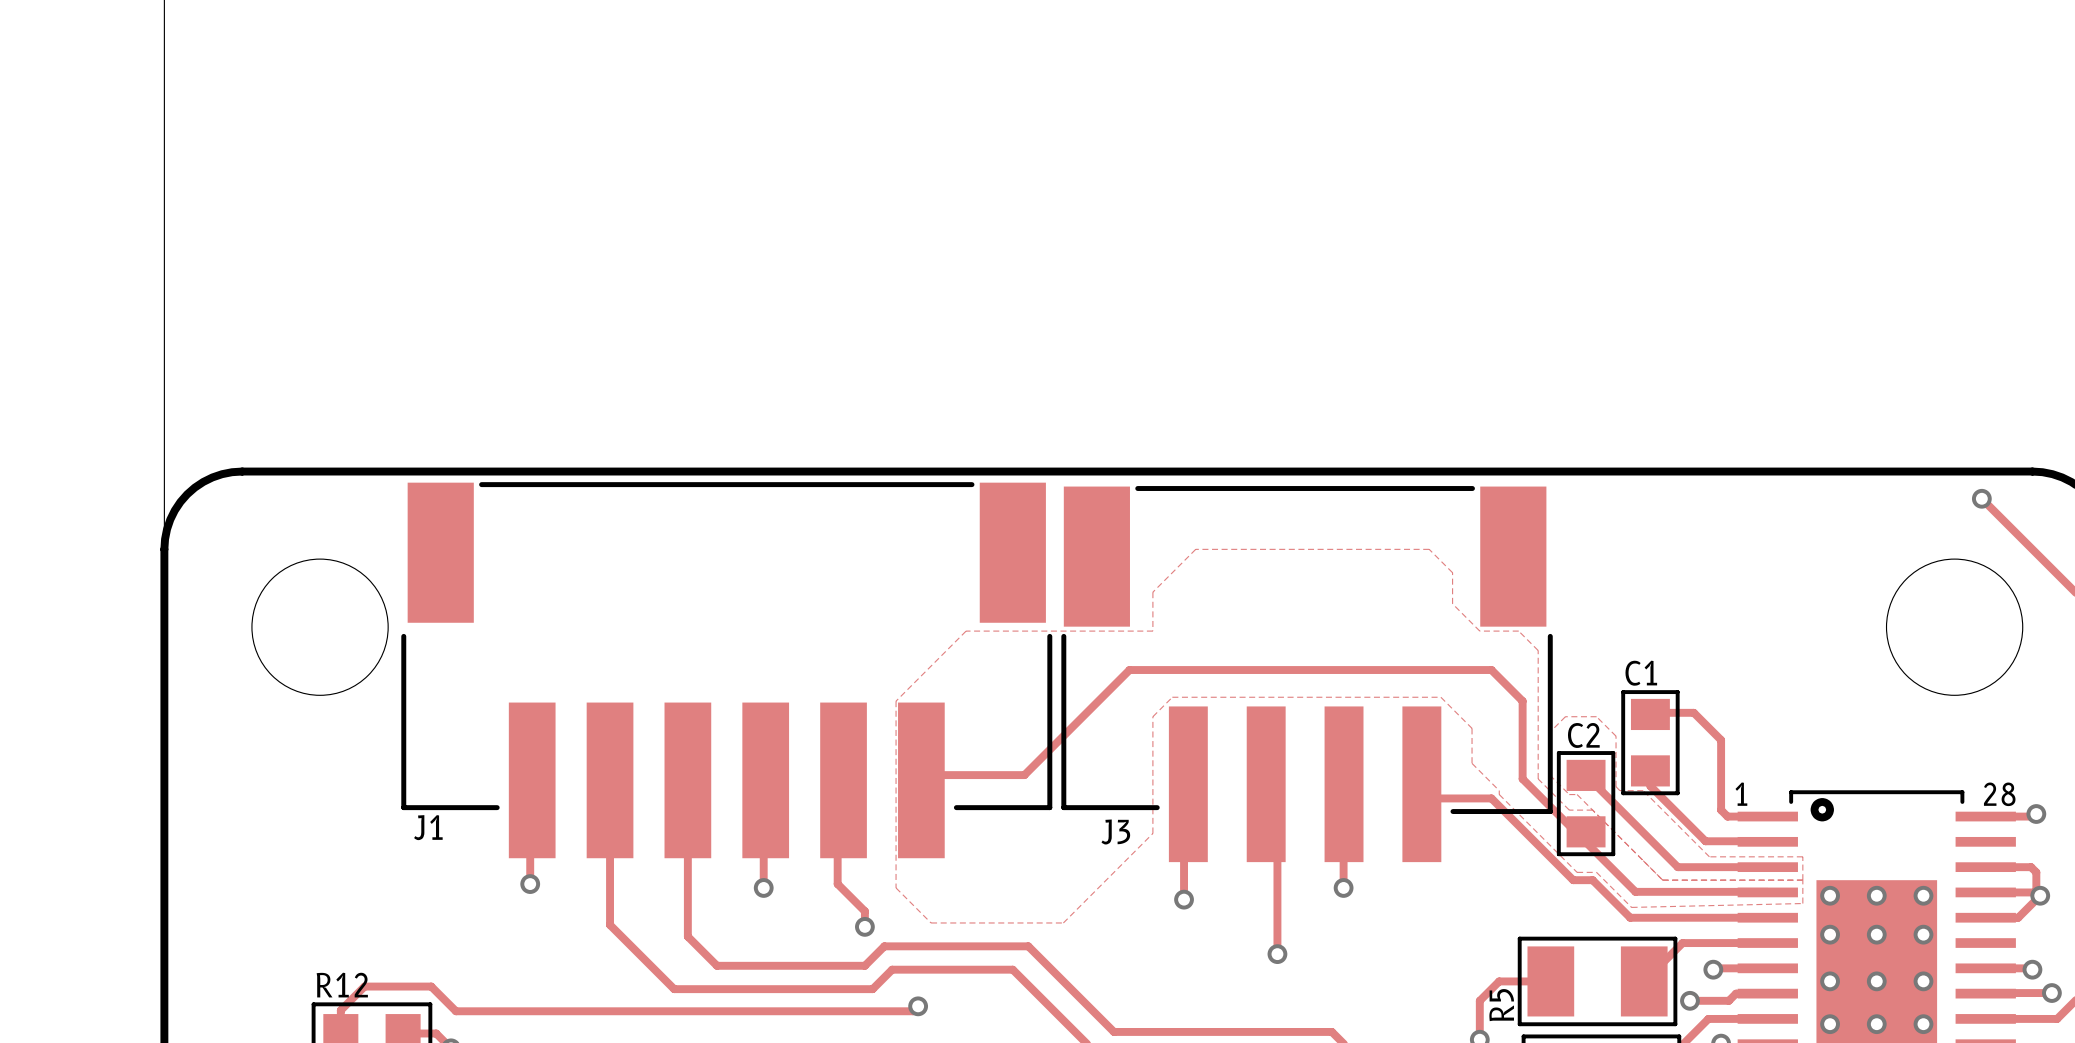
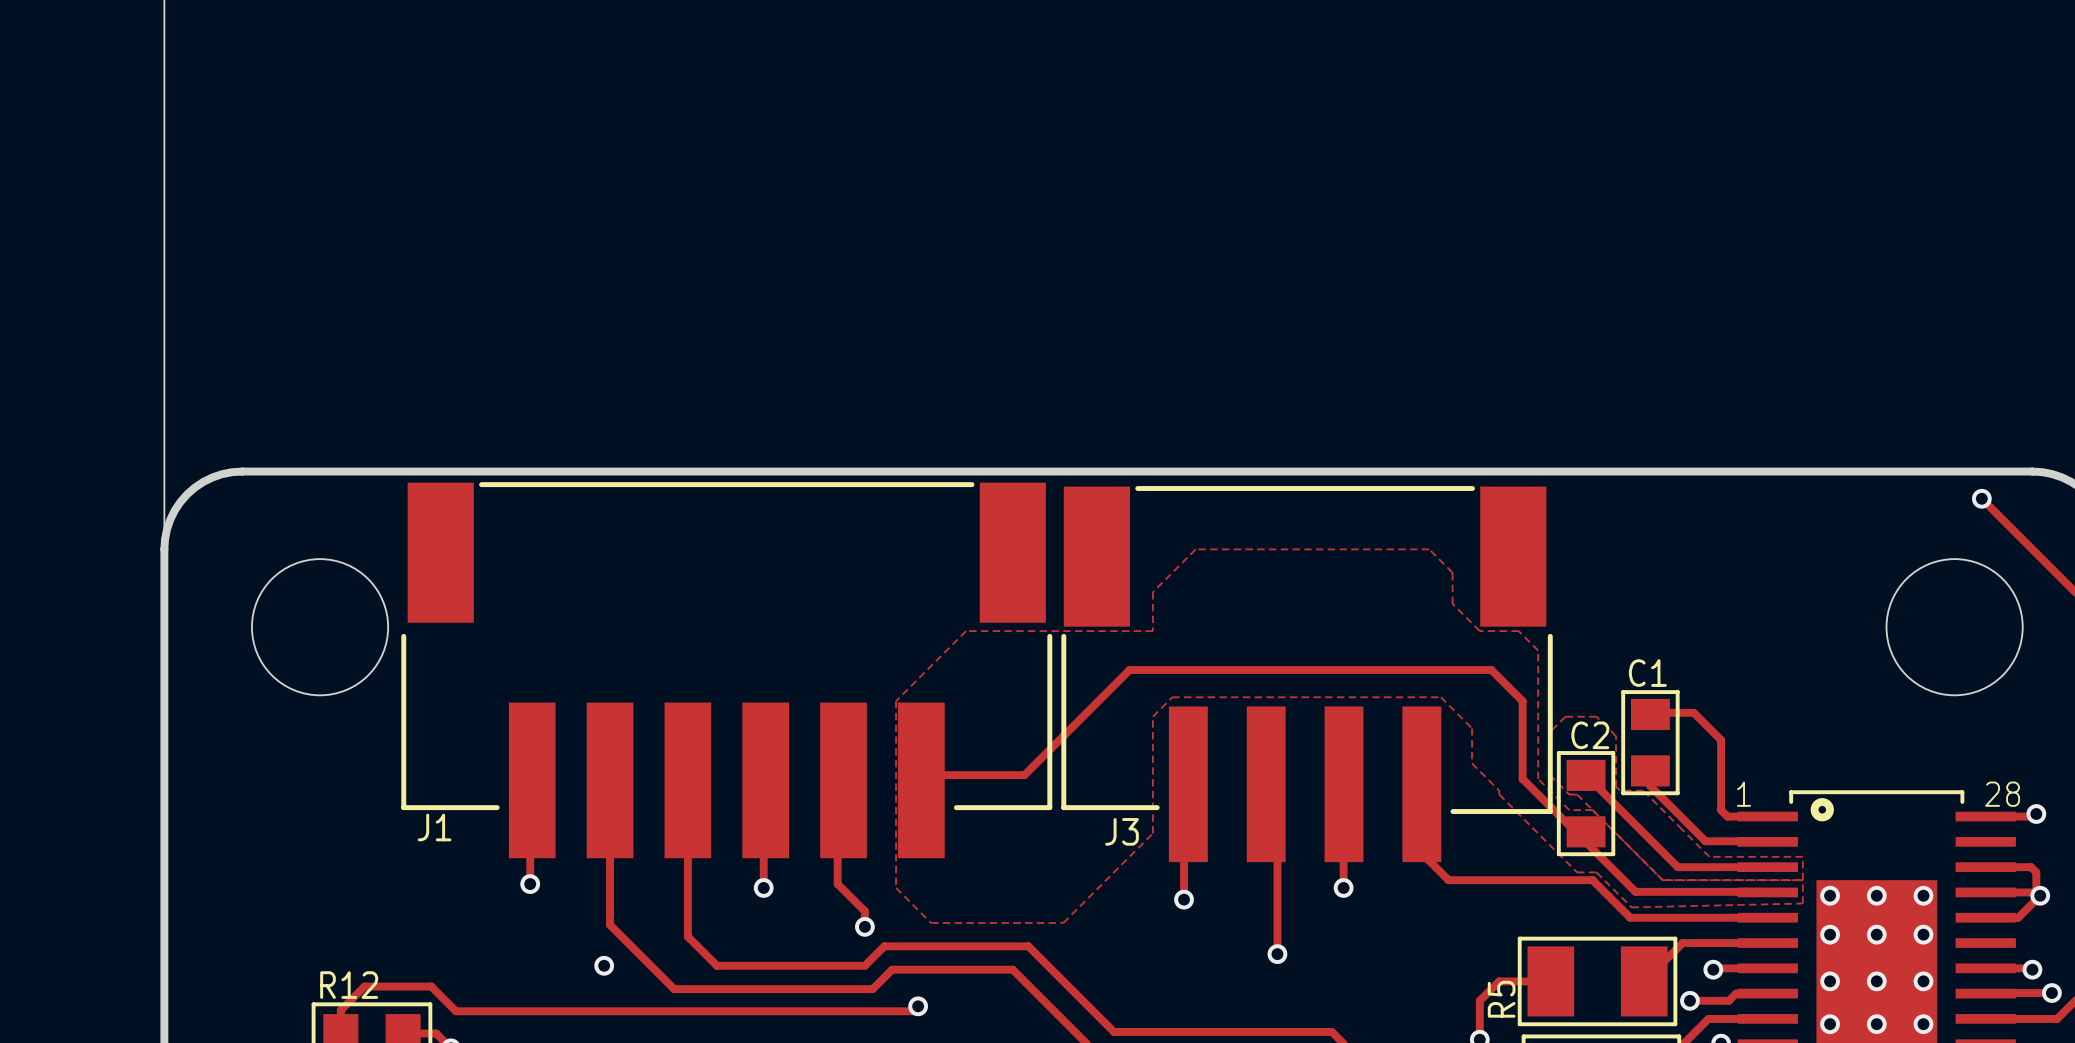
track: (1421, 784) (1436, 798) (1491, 798) (1573, 880) -> (1421, 784) (1421, 852) (1448, 880) (1573, 880)
via: none -> (604, 965)

